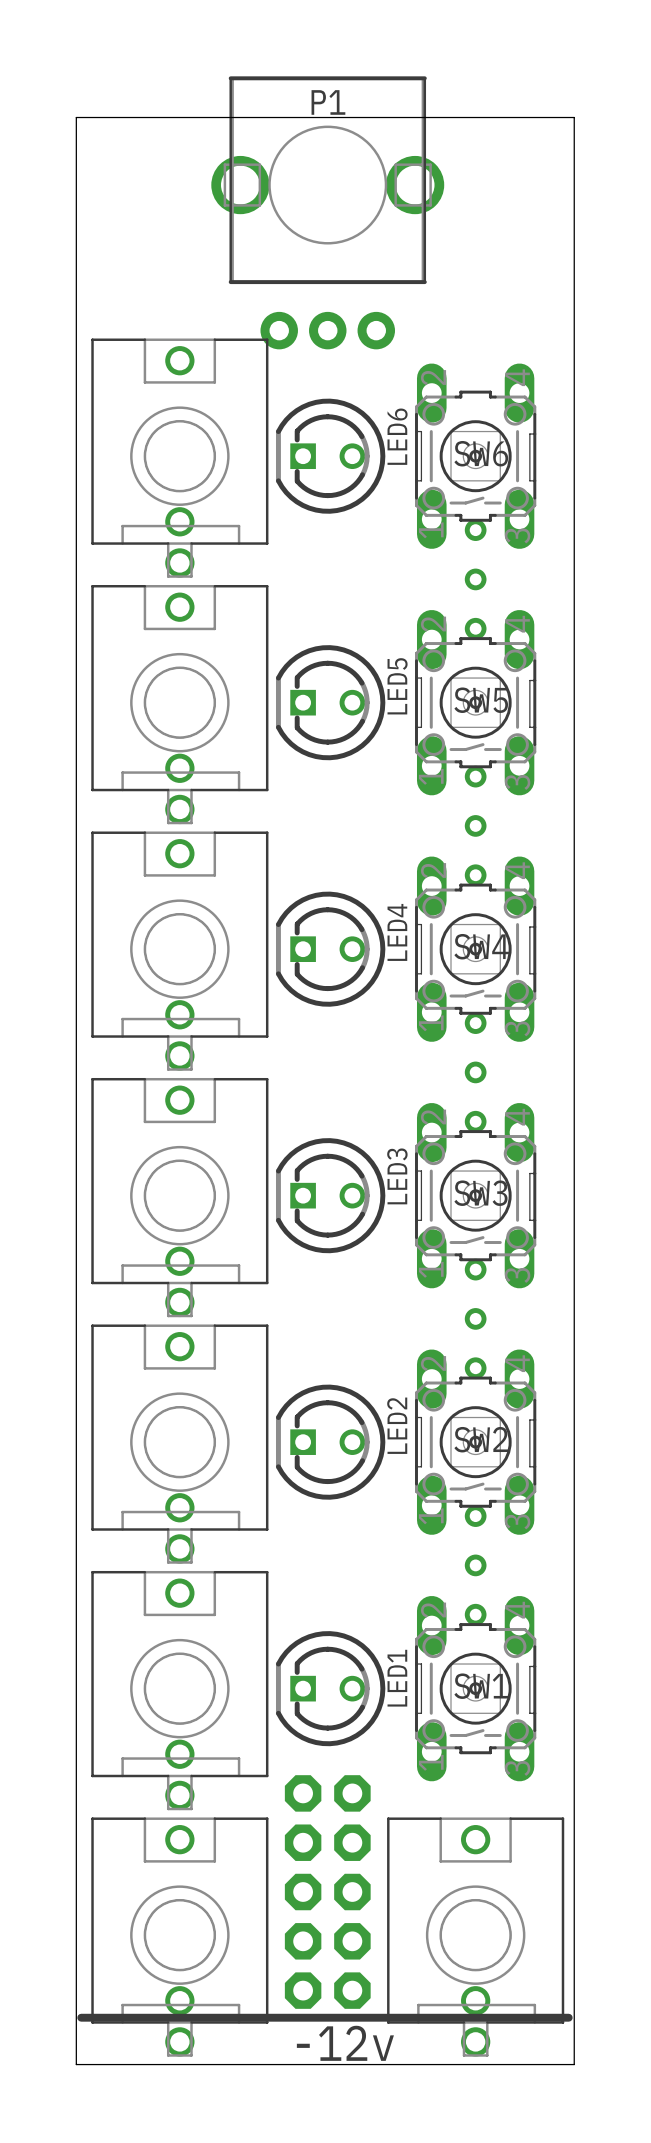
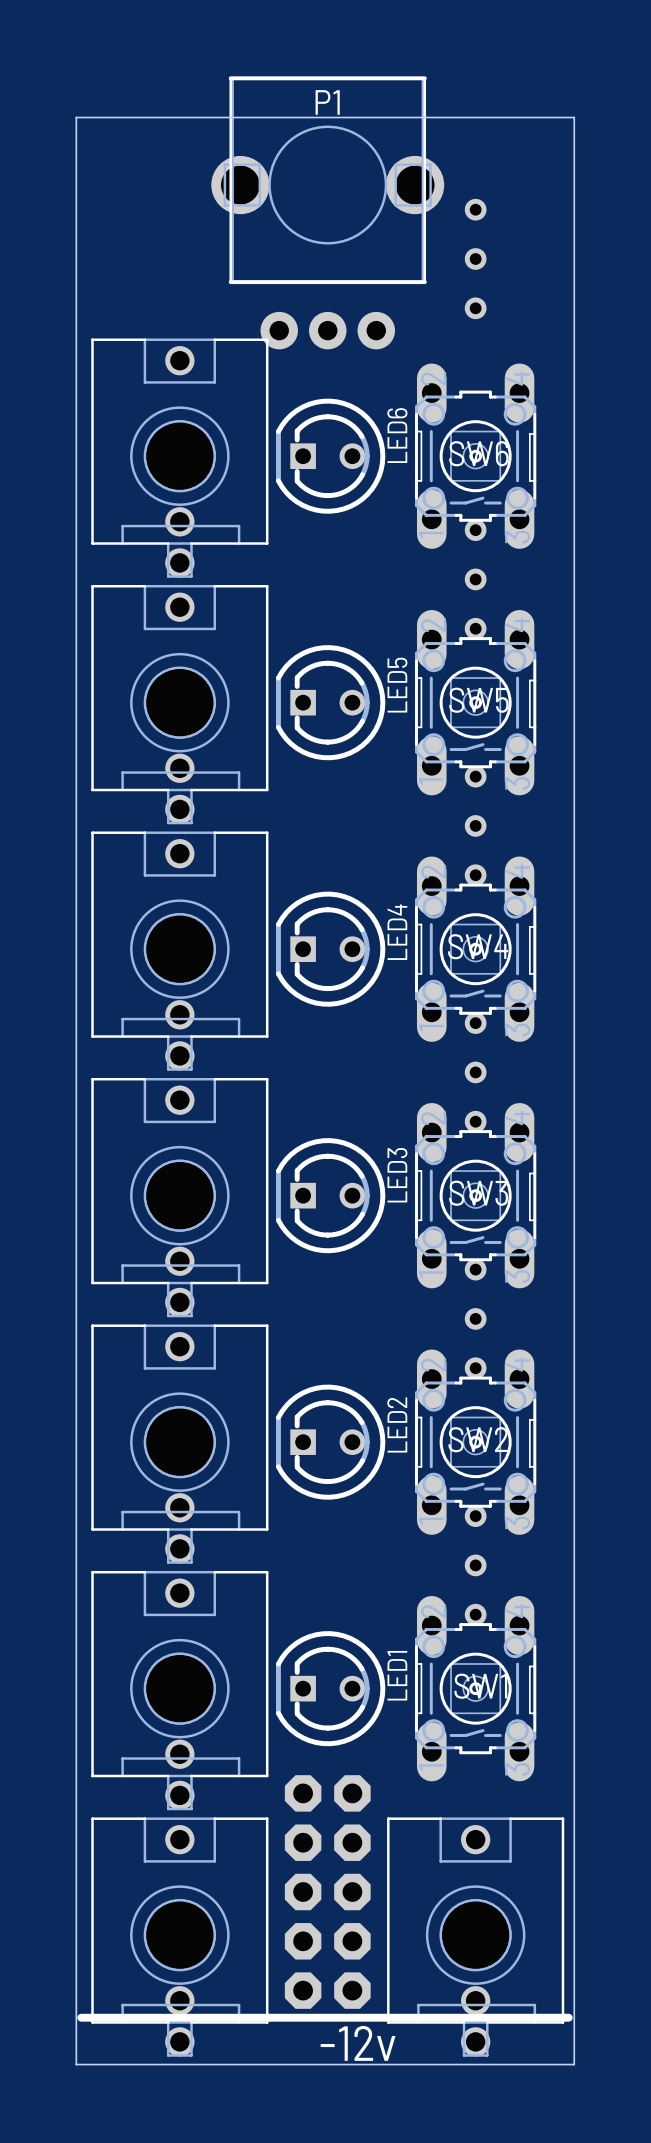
part: none -> (475, 259)

